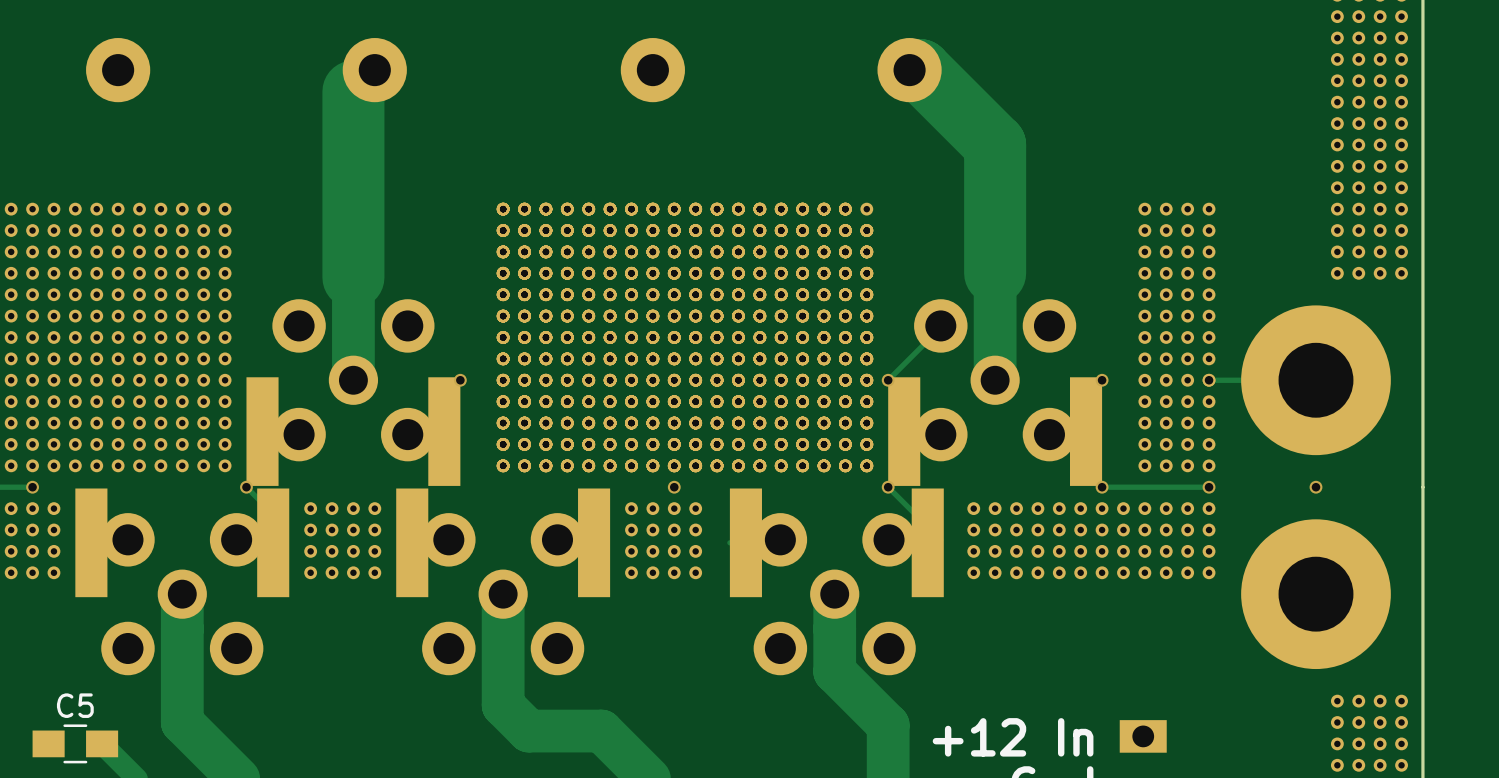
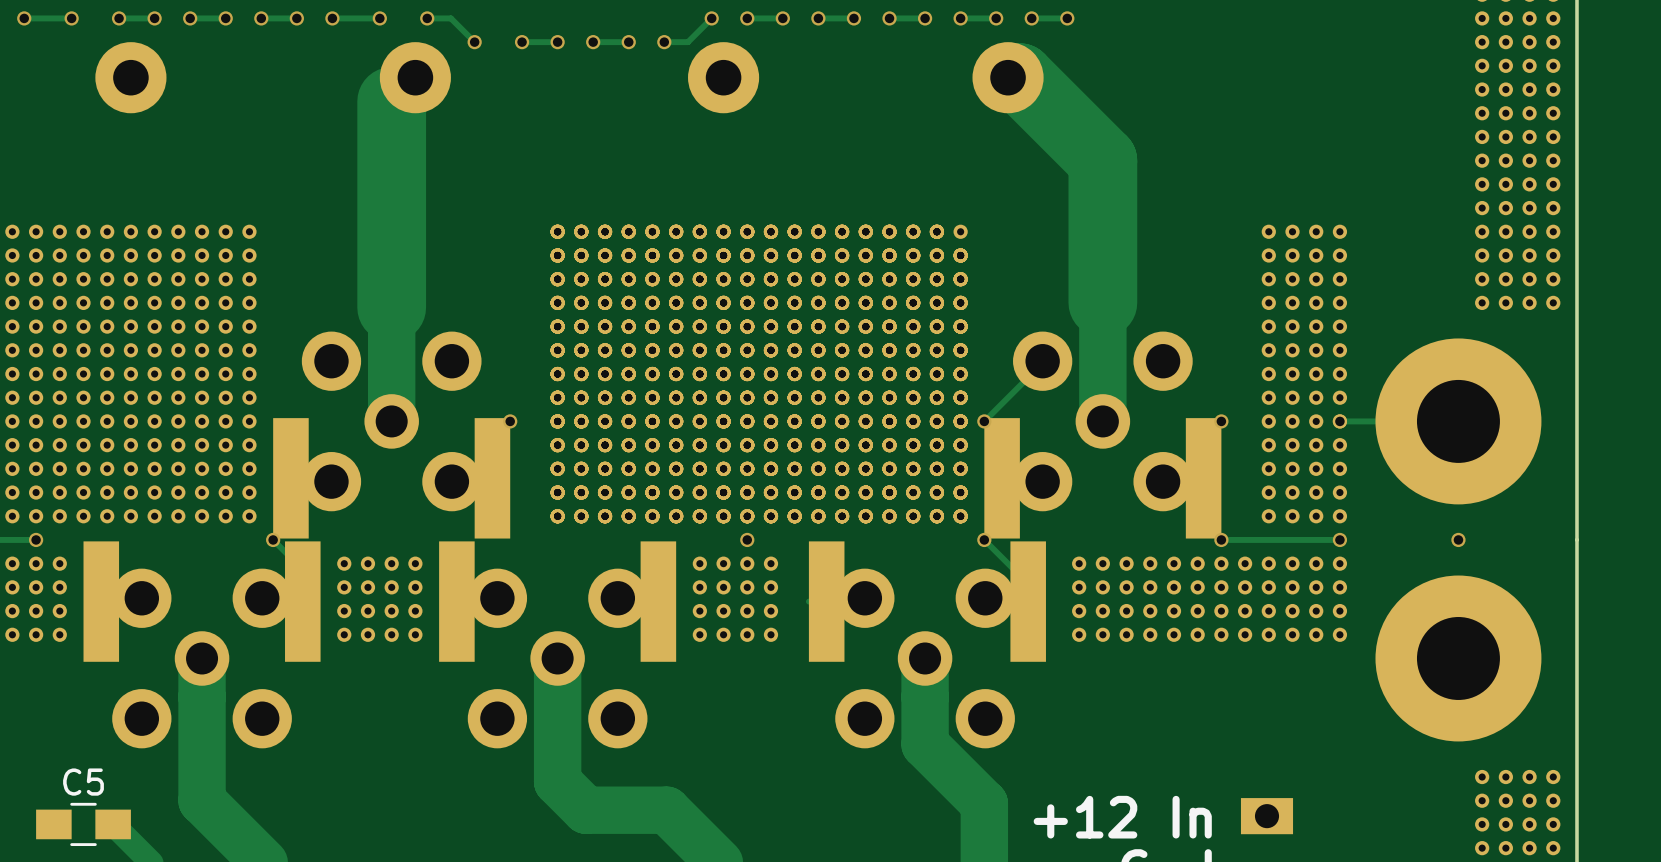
via: none -> (24, 18)
track: none -> (71, 18) (24, 18)
via: none -> (71, 18)
via: none -> (119, 18)
track: none -> (154, 18) (119, 18)
via: none -> (154, 18)
via: none -> (190, 18)
track: none -> (225, 18) (190, 18)
via: none -> (225, 18)
via: none -> (261, 18)
track: none -> (296, 18) (261, 18)
via: none -> (296, 18)
via: none -> (332, 18)
track: none -> (379, 18) (332, 18)
via: none -> (379, 18)
track: none -> (427, 18) (450, 18) (474, 42)
via: none -> (427, 18)
track: none -> (711, 18) (688, 42) (664, 42)
via: none -> (711, 18)
via: none -> (747, 18)
track: none -> (782, 18) (747, 18)
via: none -> (782, 18)
via: none -> (818, 18)
track: none -> (853, 18) (818, 18)
via: none -> (853, 18)
via: none -> (889, 18)
track: none -> (925, 18) (889, 18)
via: none -> (925, 18)
via: none -> (960, 18)
track: none -> (996, 18) (960, 18)
via: none -> (996, 18)
via: none -> (1031, 18)
track: none -> (1067, 18) (1031, 18)
via: none -> (1067, 18)
via: none -> (474, 42)
via: none -> (522, 42)
track: none -> (557, 42) (522, 42)
via: none -> (557, 42)
via: none -> (593, 42)
track: none -> (628, 42) (593, 42)
via: none -> (628, 42)
via: none -> (664, 42)

